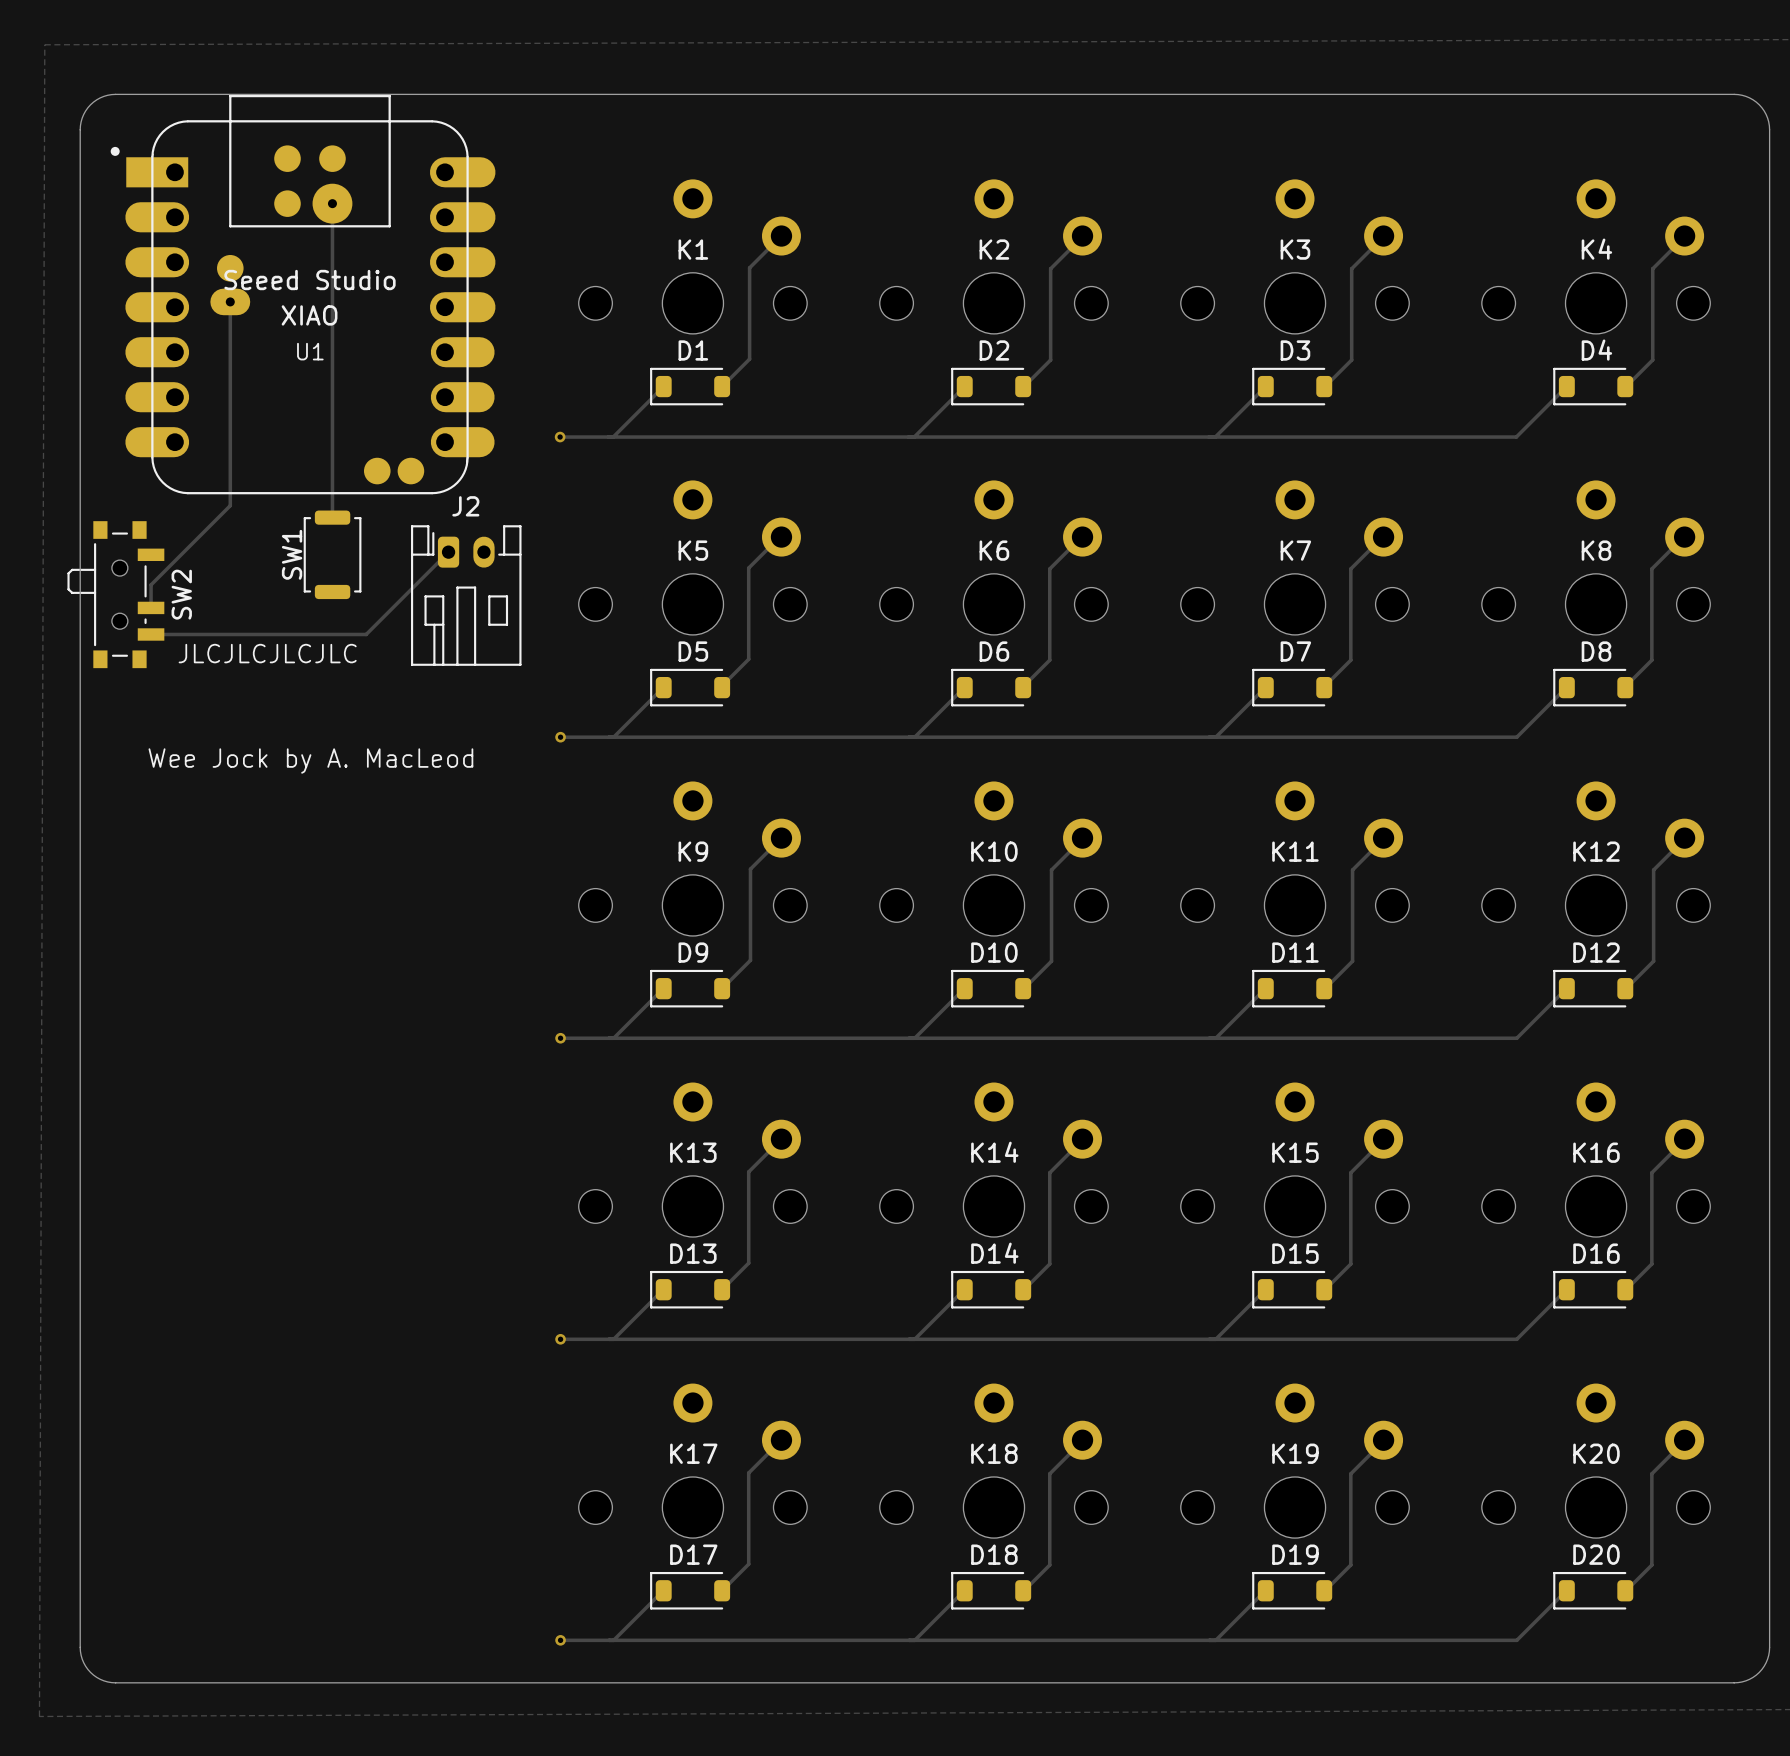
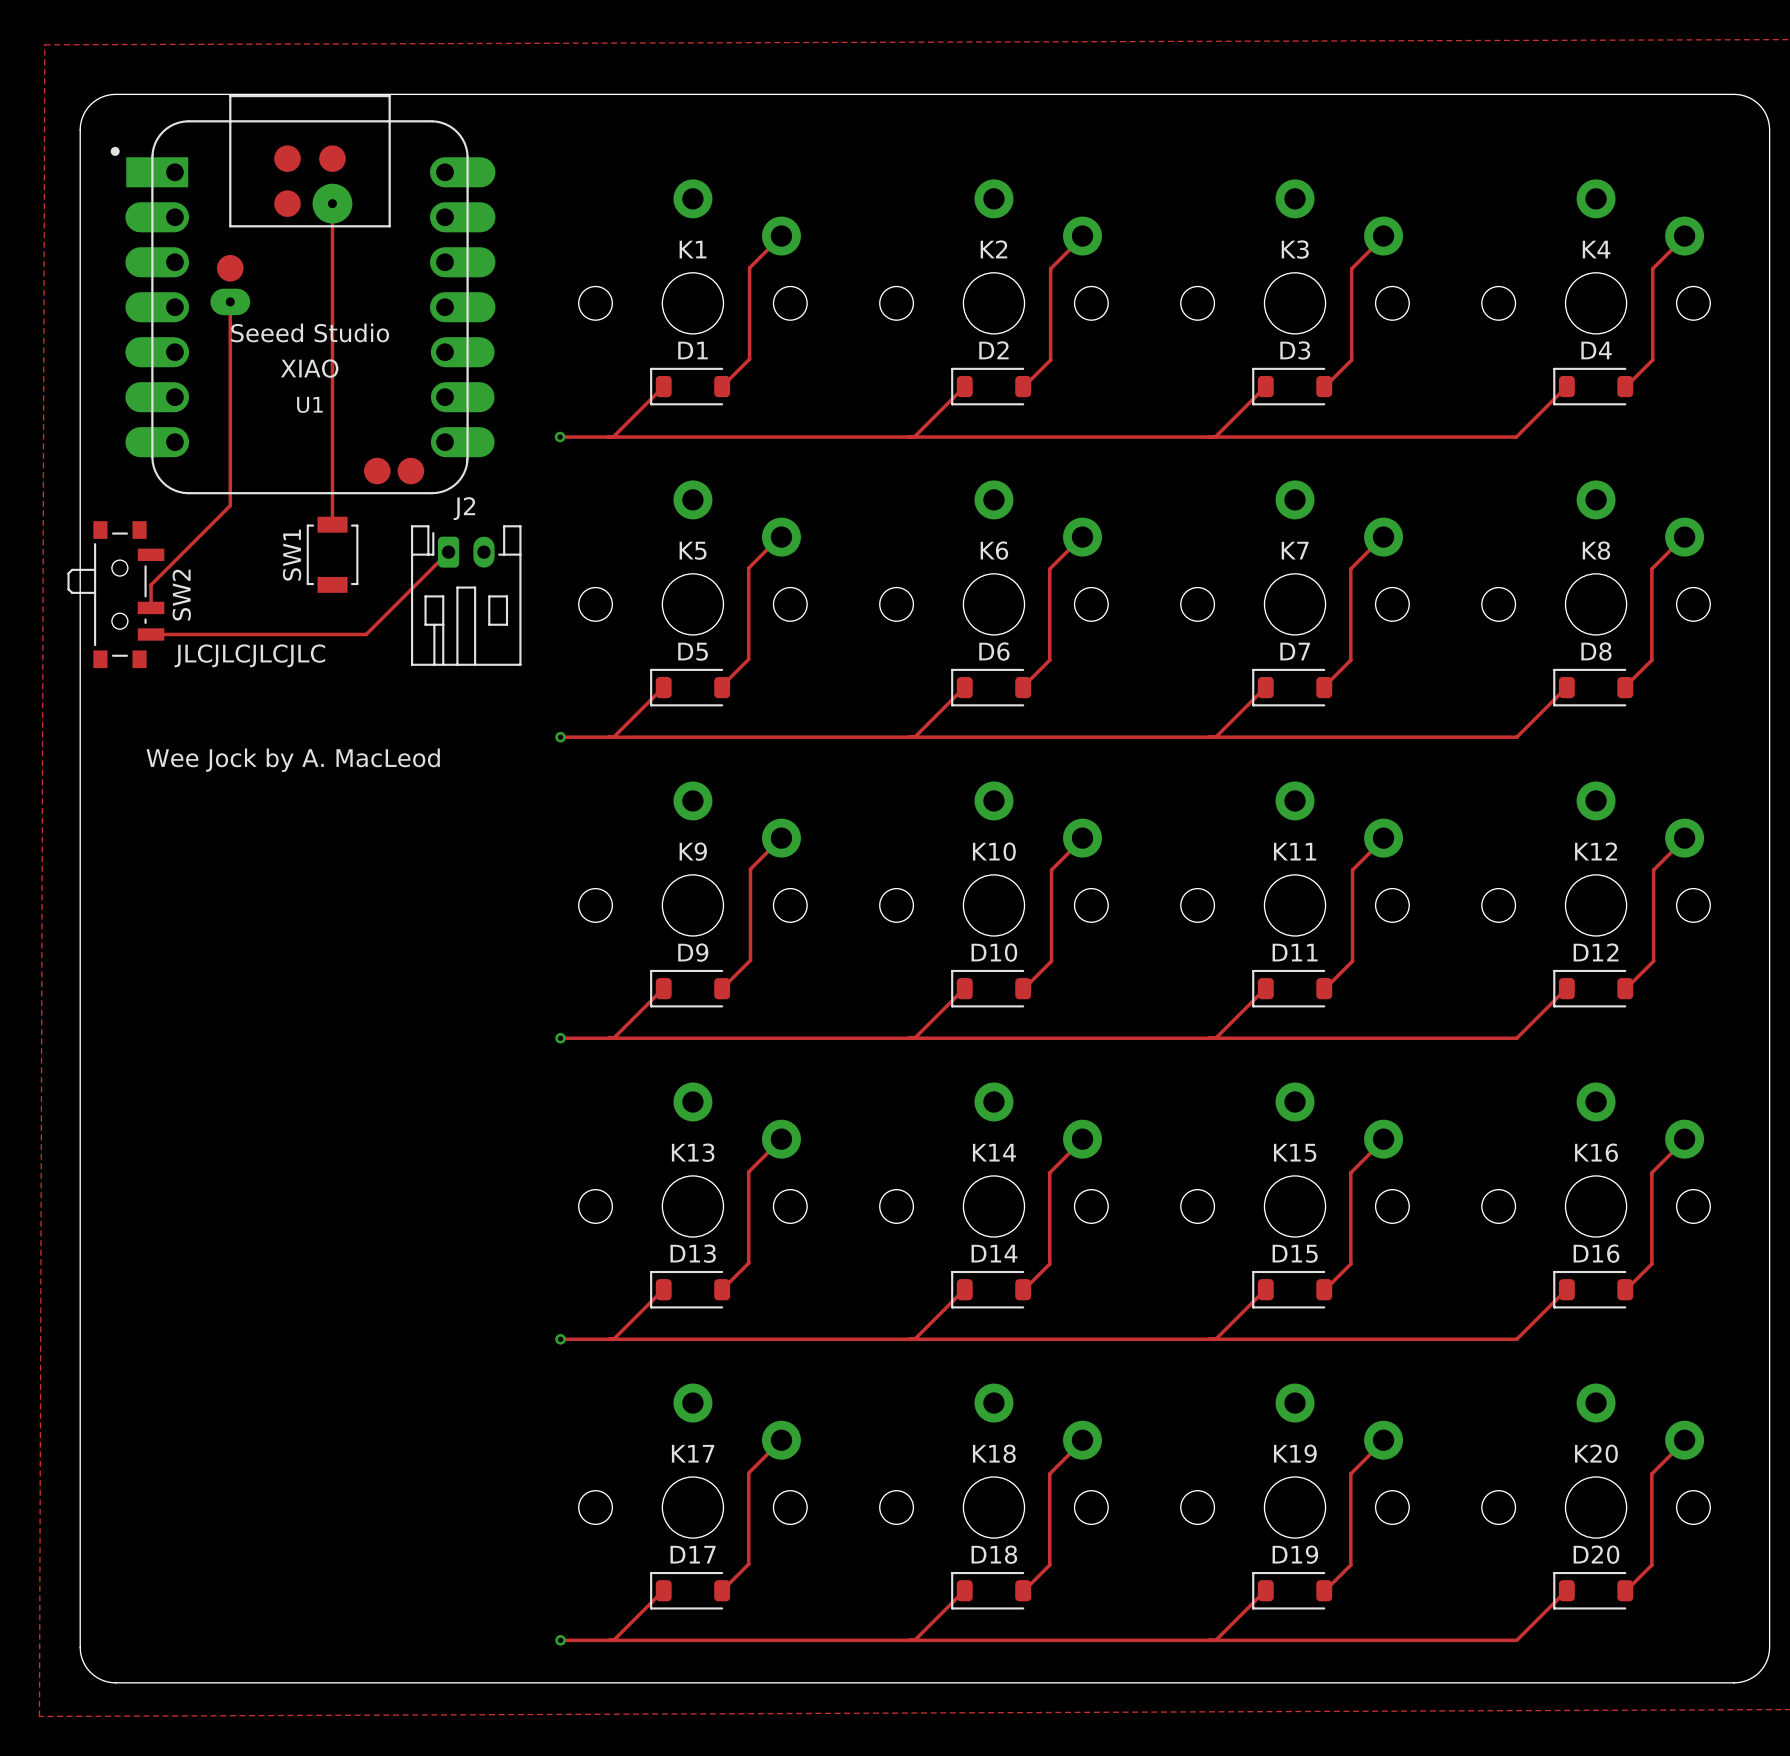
U1 text position: Seeed Studio (309, 280) -> Seeed Studio (310, 332)
U1 text position: XIAO (309, 315) -> XIAO (309, 368)
U1 name position: U1 (310, 351) -> U1 (309, 404)
SW1 footprint: [303, 510, 362, 600] -> [306, 516, 359, 593]

